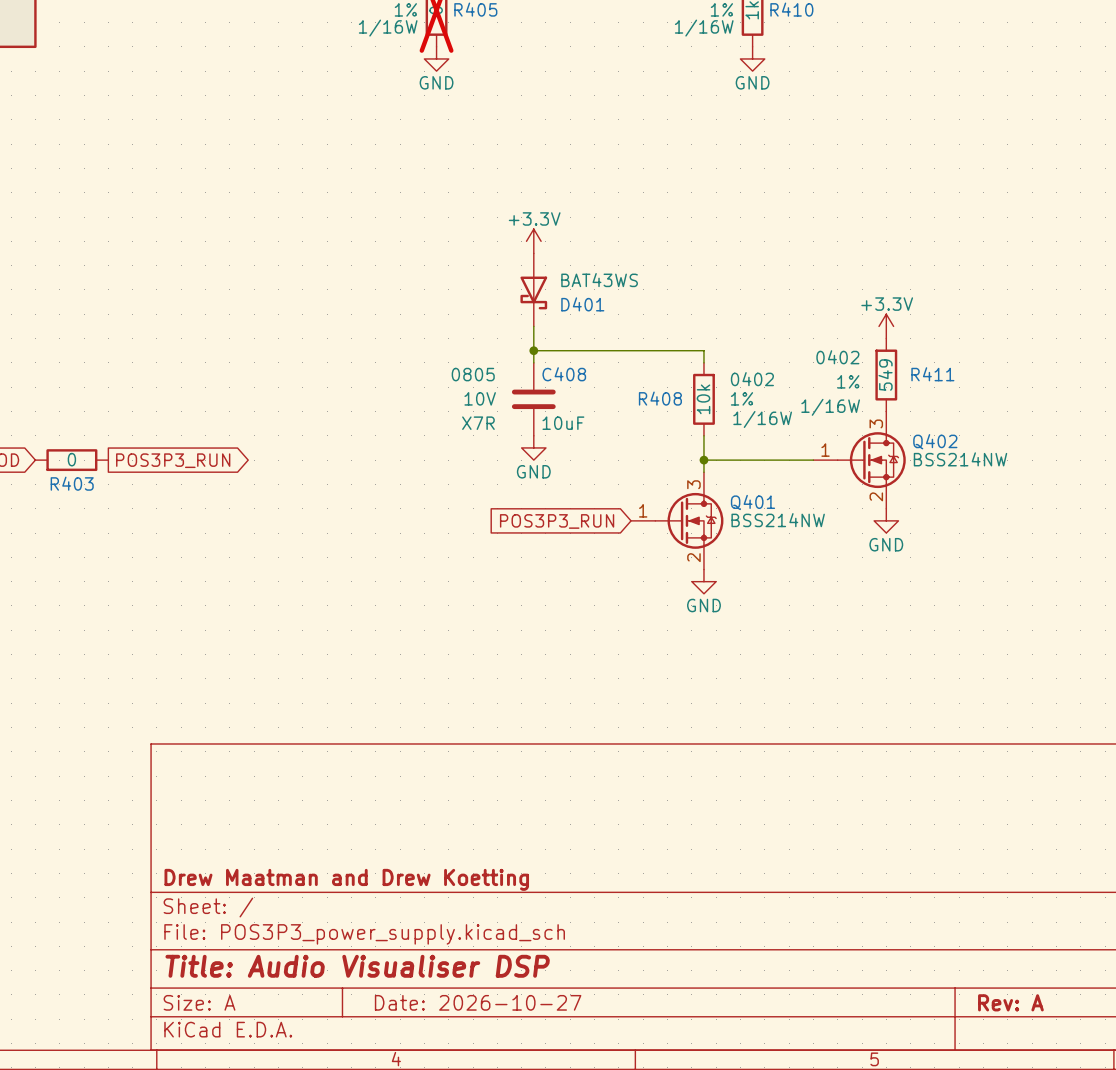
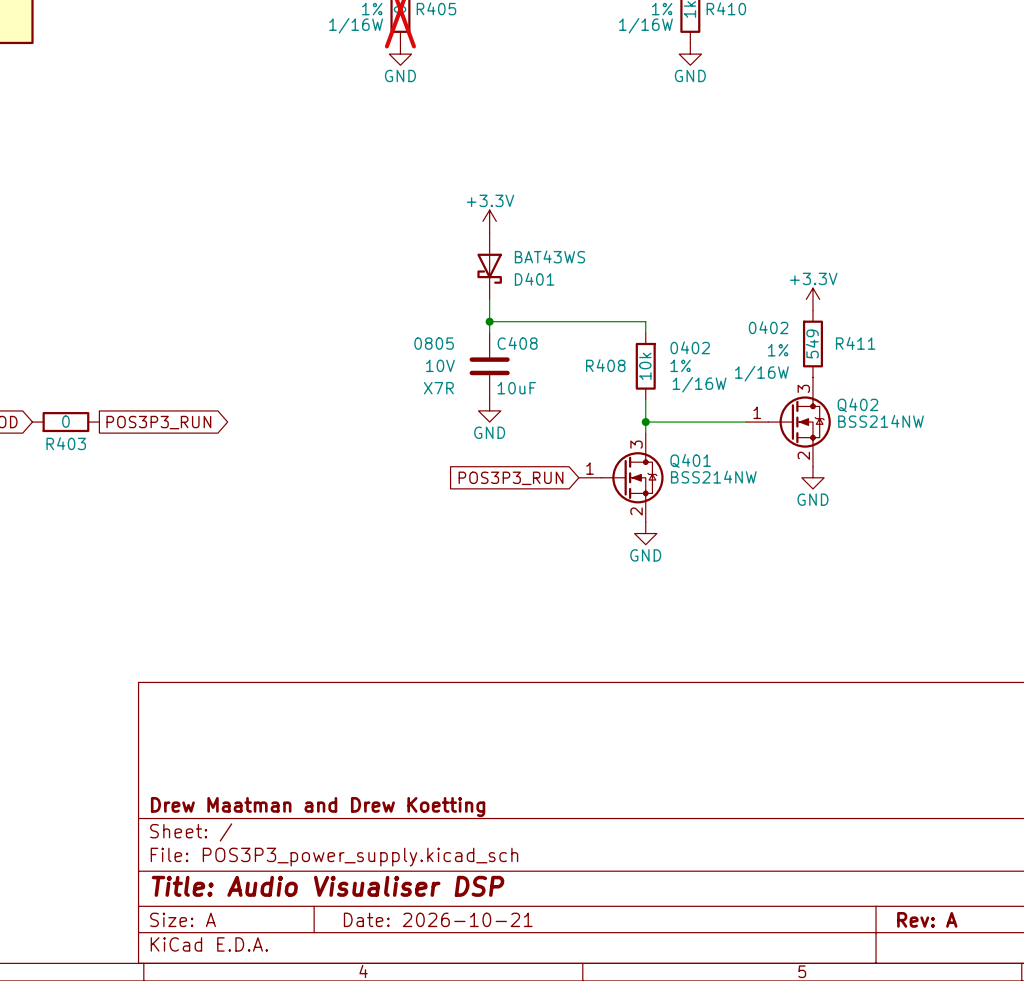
title block: Date: 2026-10-27 (478, 1002) -> Date: 2026-10-21 (438, 919)

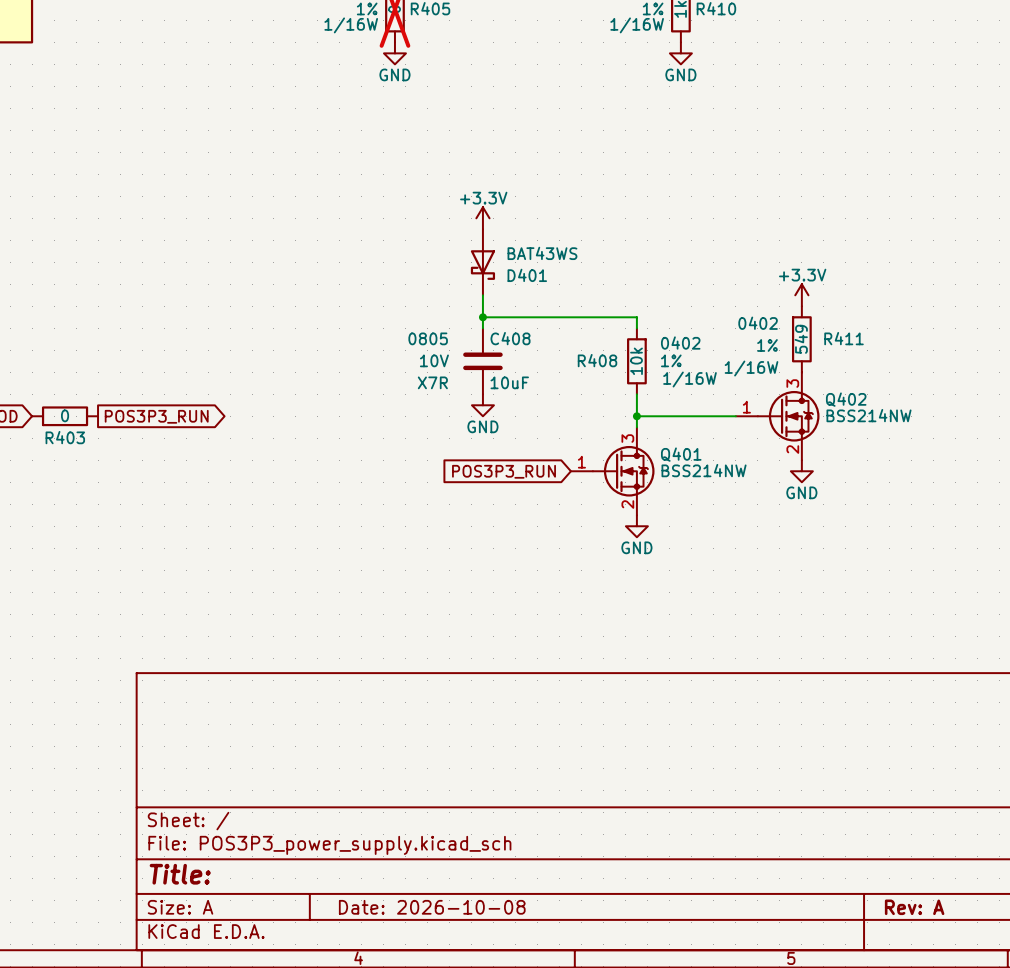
title block: Drew Maatman and Drew Koetting (318, 807) -> none
title block: Title: Audio Visualiser DSP (328, 886) -> Title: (180, 874)
title block: Date: 2026-10-21 (438, 919) -> Date: 2026-10-08 (432, 907)

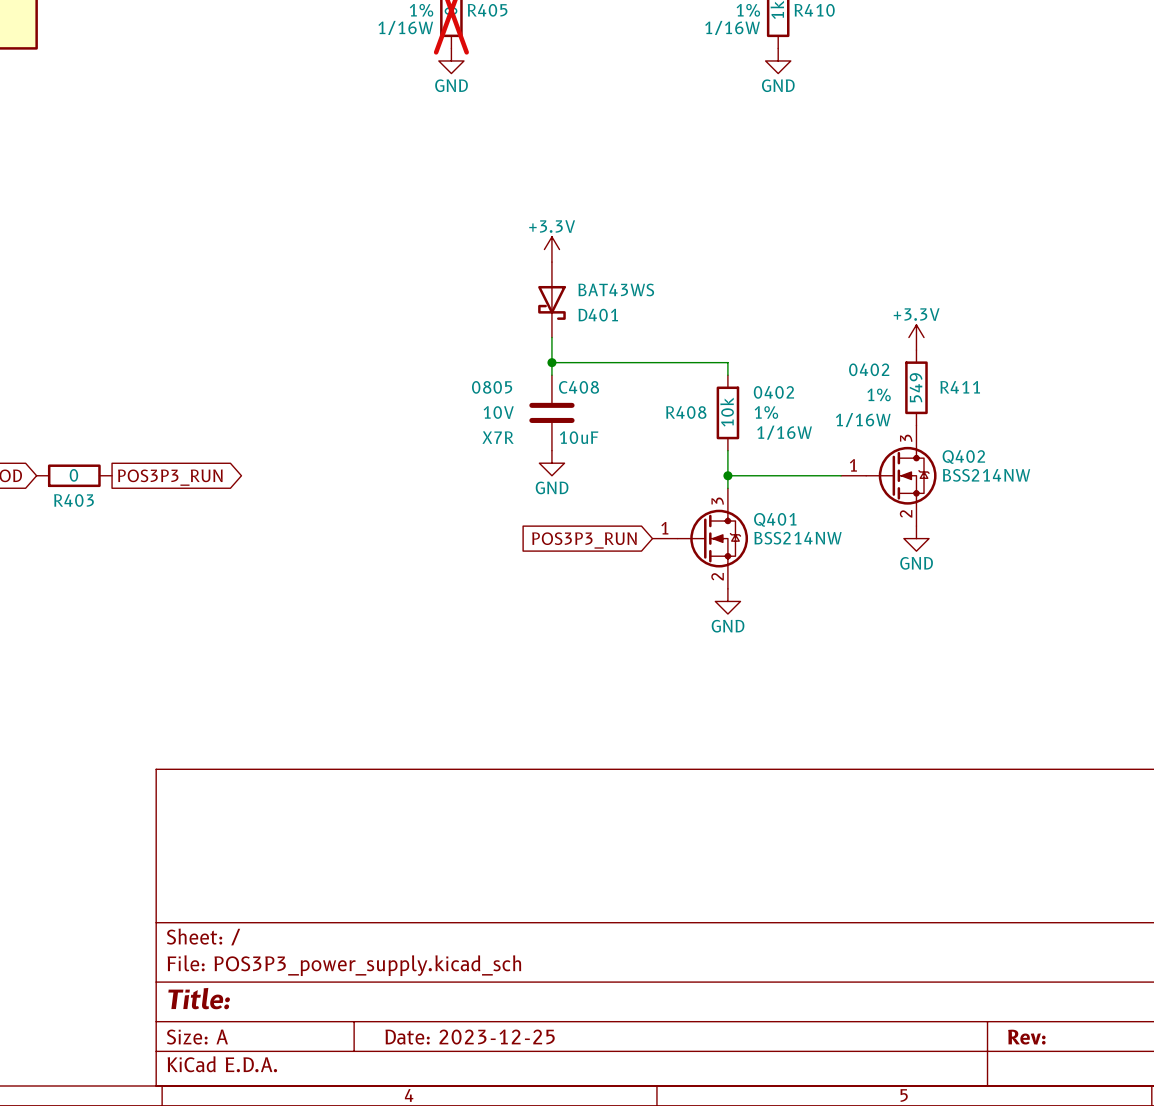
title block: Date: 2026-10-08 (432, 907) -> Date: 2023-12-25 (470, 1037)
title block: Rev: A (914, 907) -> Rev: (1026, 1037)

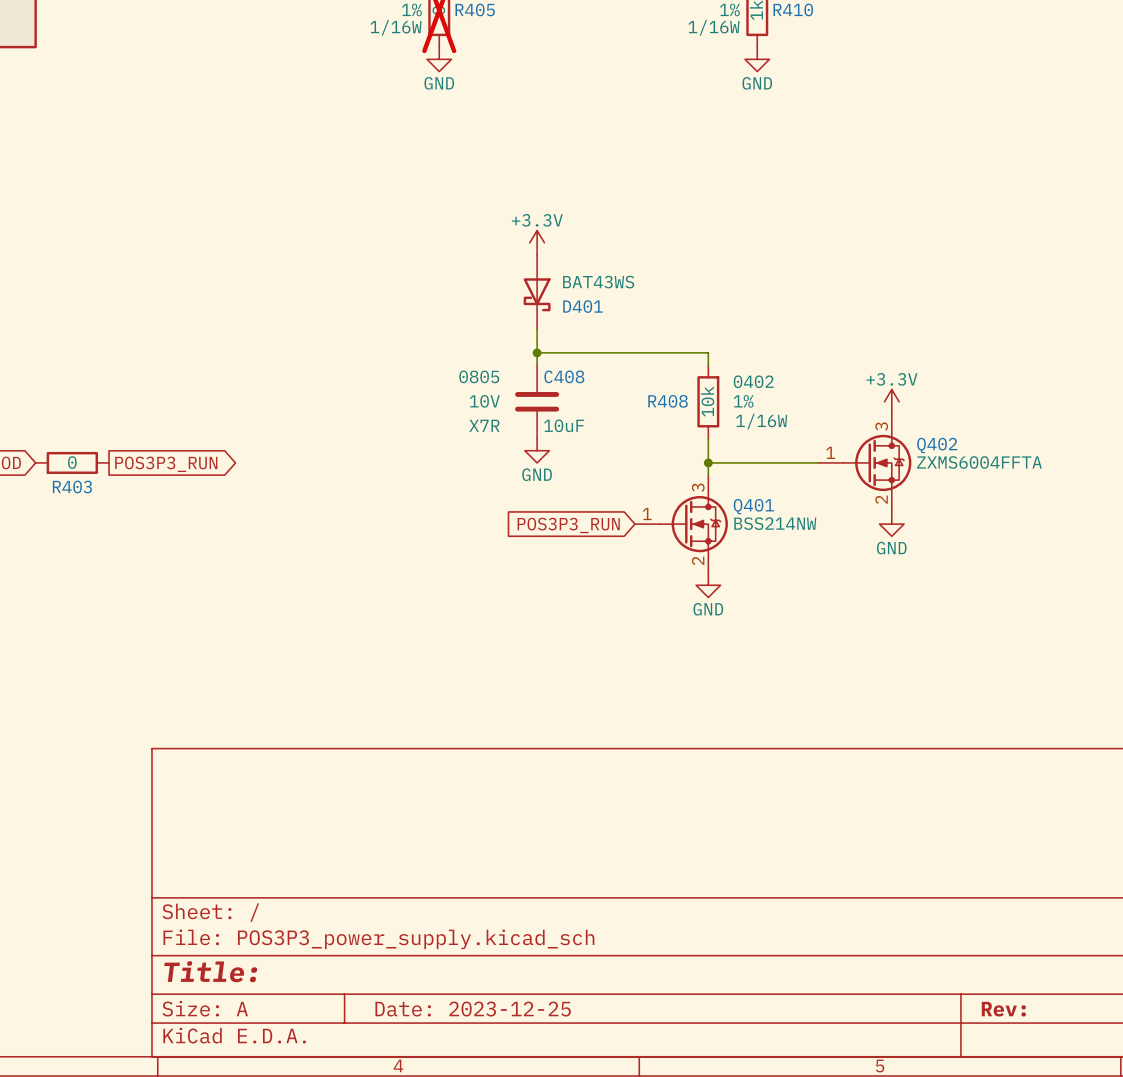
power symbol position: +3.3V (916, 337) -> +3.3V (891, 401)
R411: 549 (916, 387) -> none
Q402 value: BSS214NW (986, 475) -> ZXMS6004FFTA (979, 462)

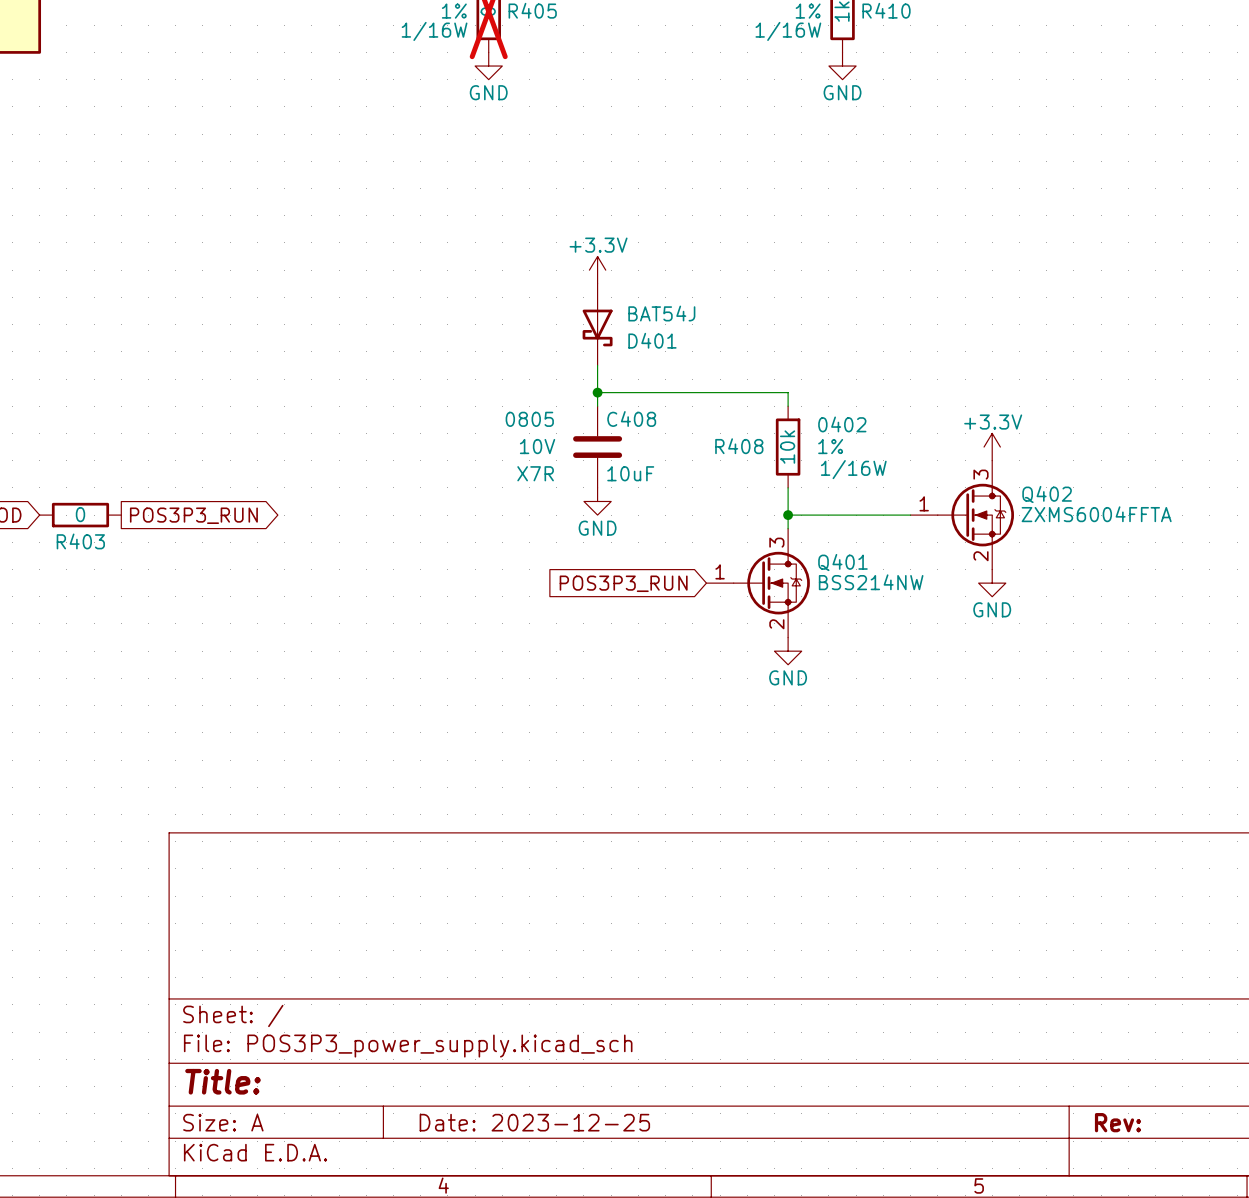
D401 value: BAT43WS (598, 282) -> BAT54J (661, 313)

